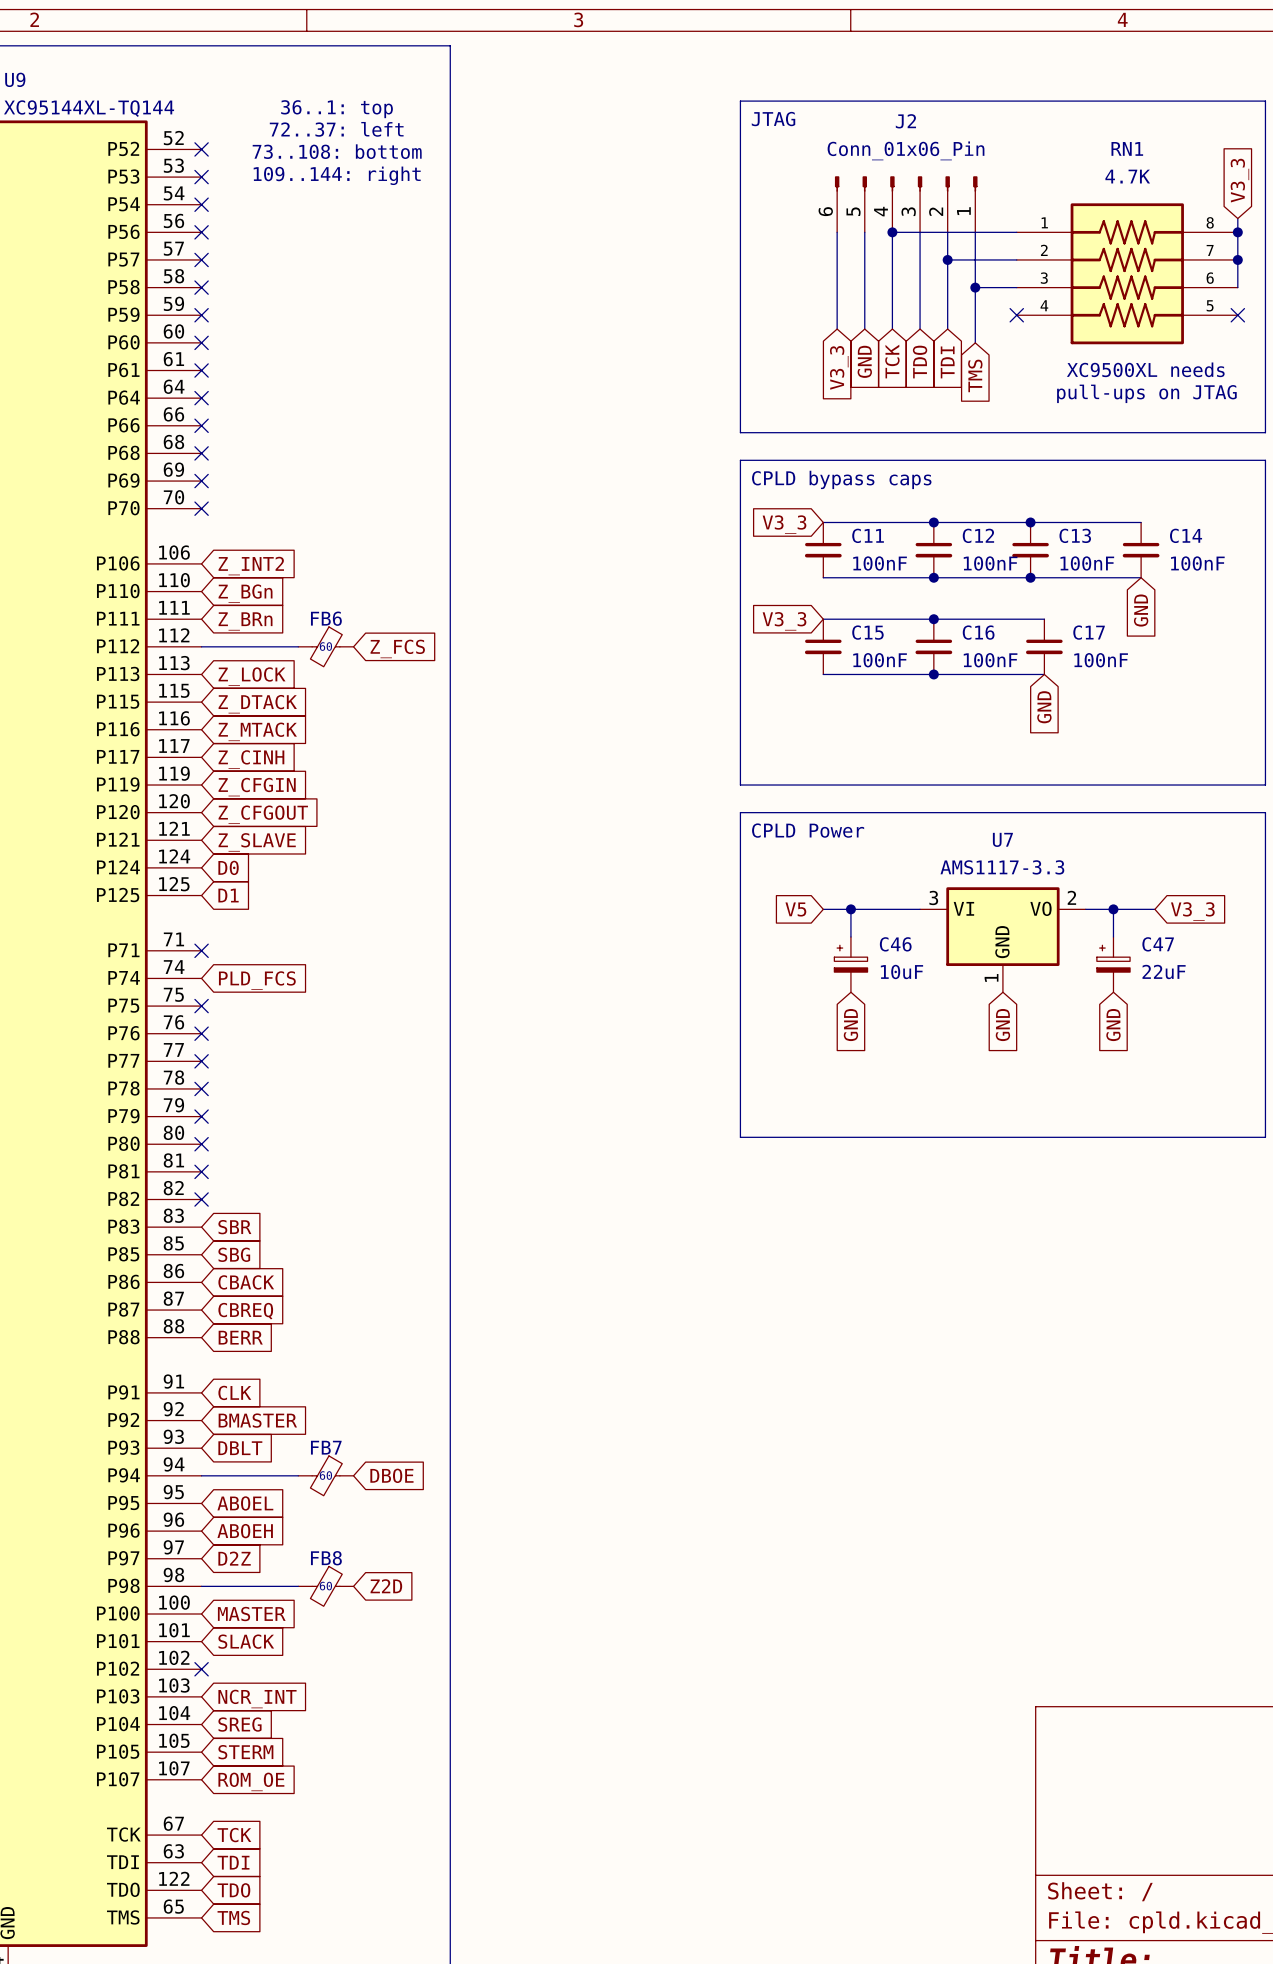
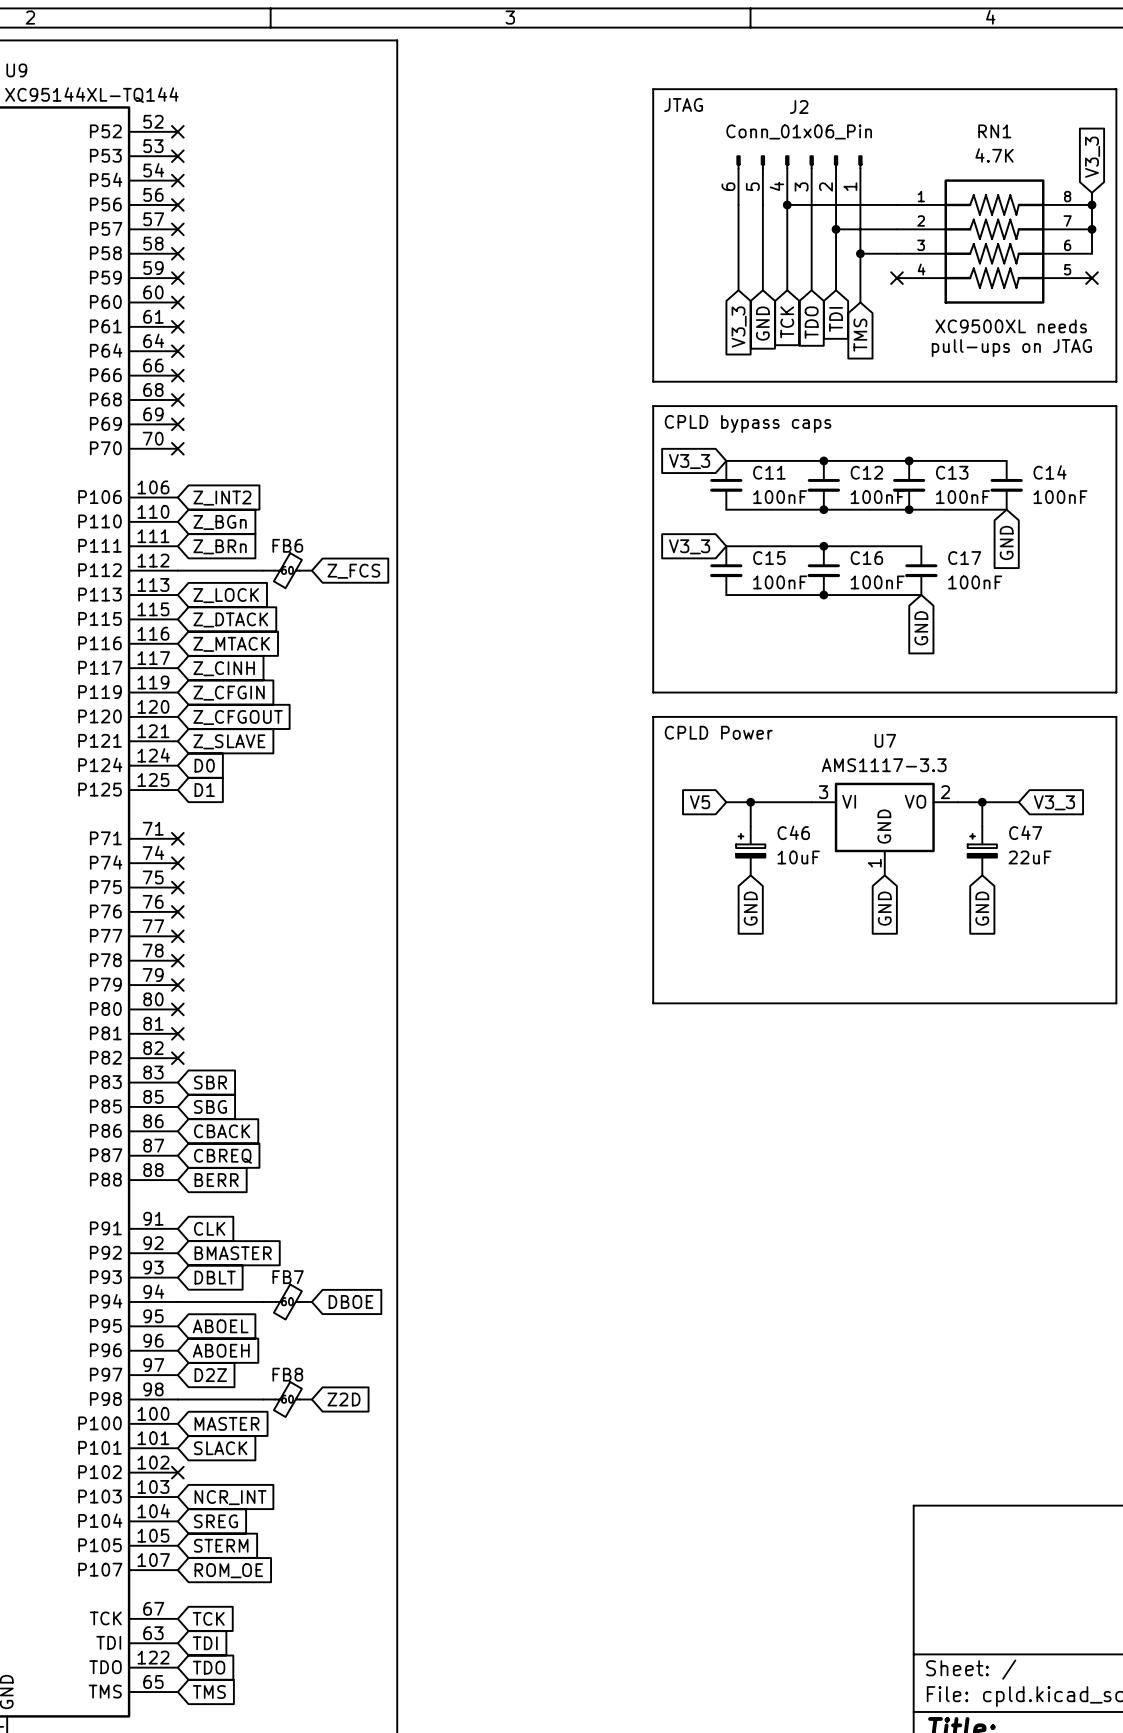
text: 36..1: top (337, 109) -> none
text: 72..37: left (336, 129) -> none
text: 73..108: bottom (337, 151) -> none
text: 109..144: right (337, 175) -> none
no-connect mark: none -> (177, 863)
global label: PLD_FCS (257, 980) -> none

